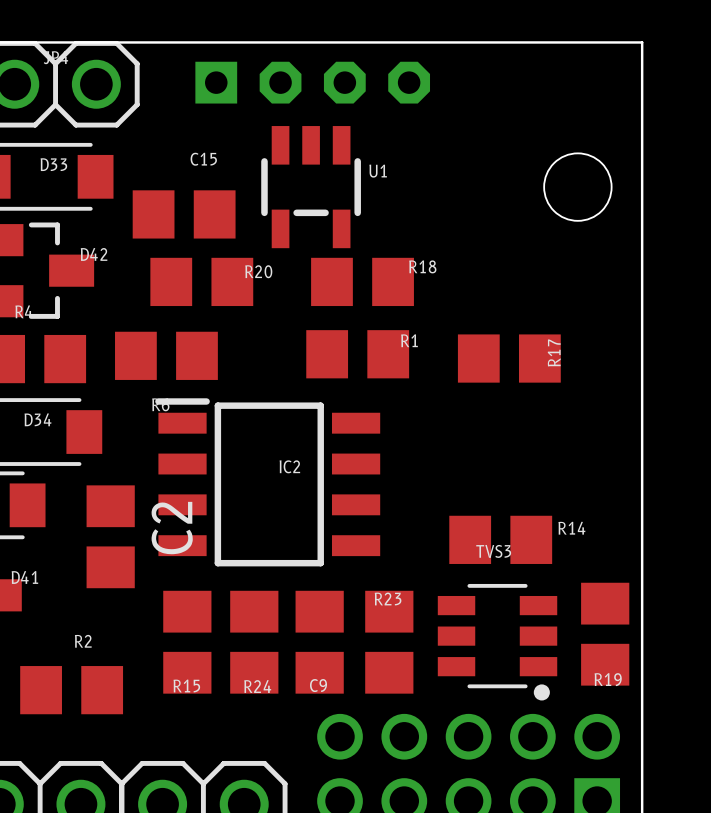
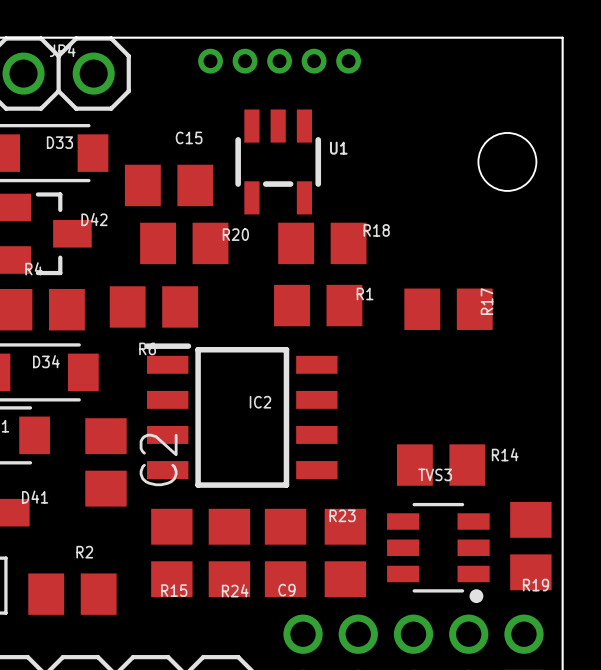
part footprint: [195, 61, 431, 104] -> [198, 48, 362, 74]

